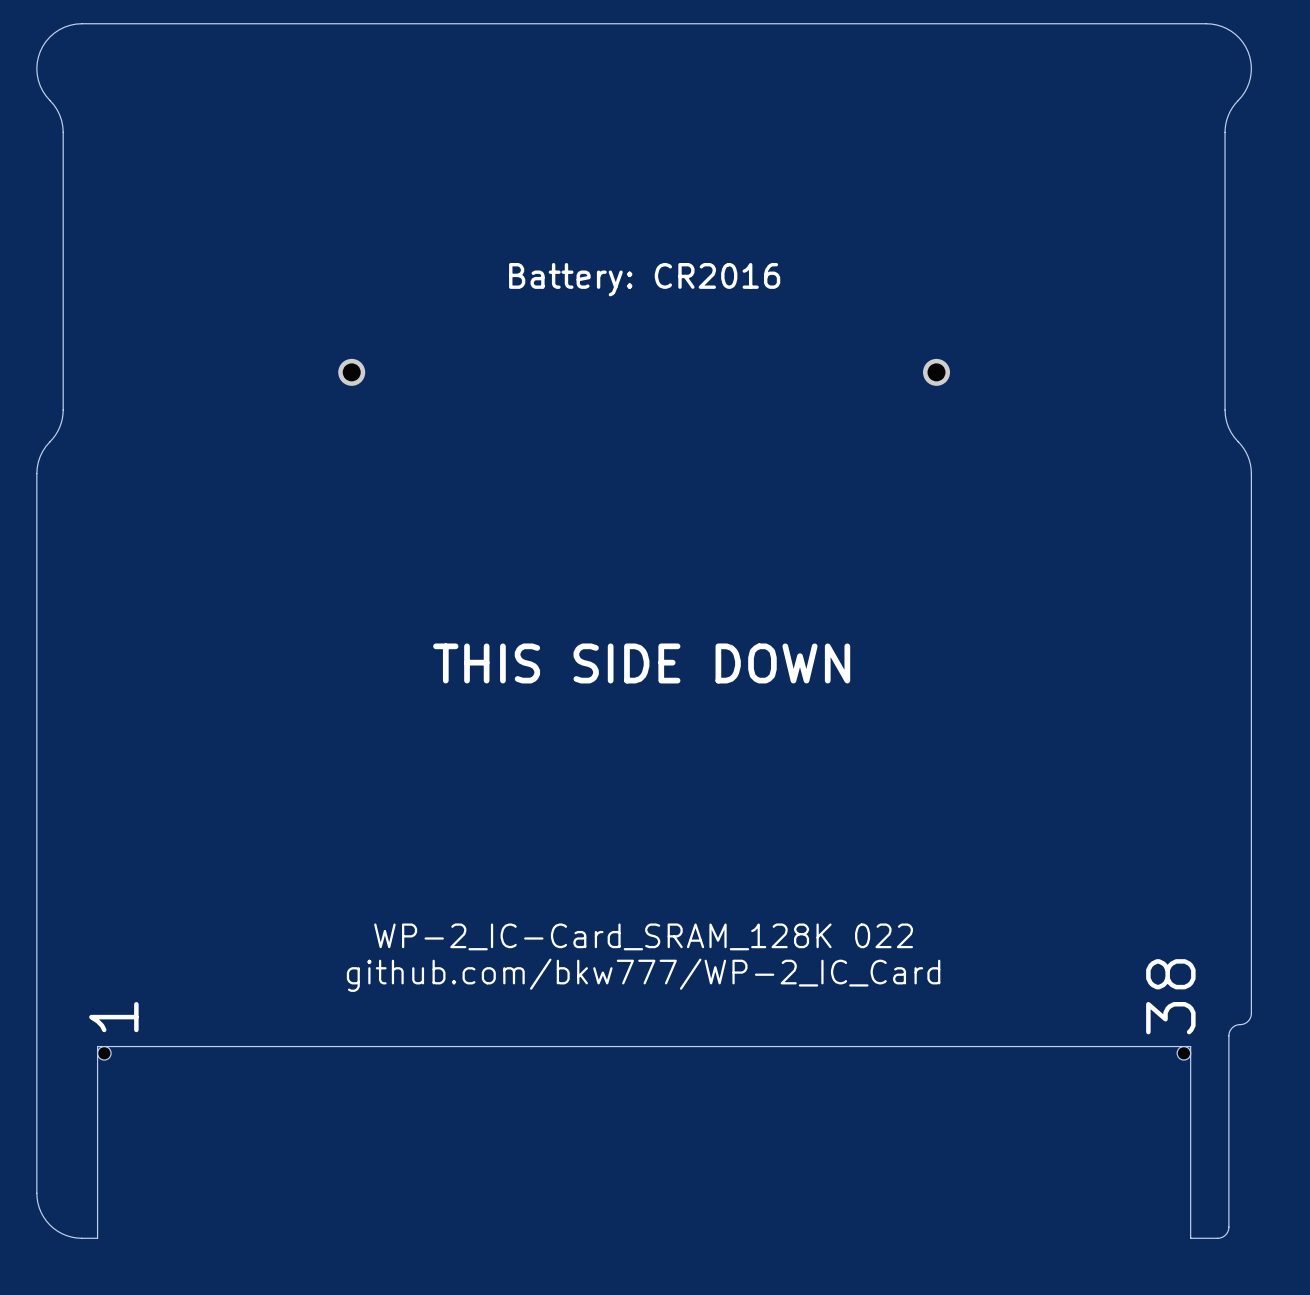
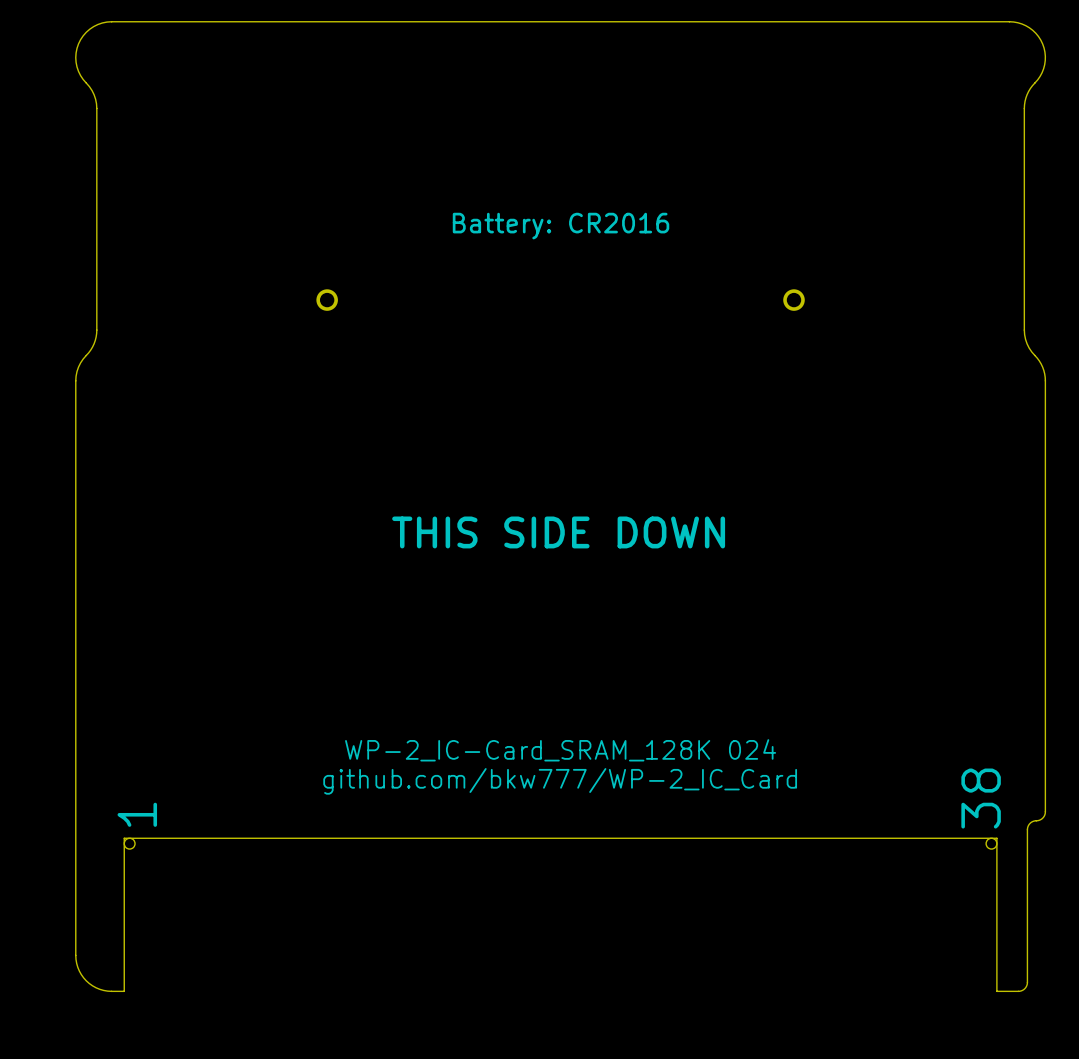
text: WP-2_IC-Card_SRAM_128K 022 (643, 936) -> WP-2_IC-Card_SRAM_128K 024 (560, 750)

